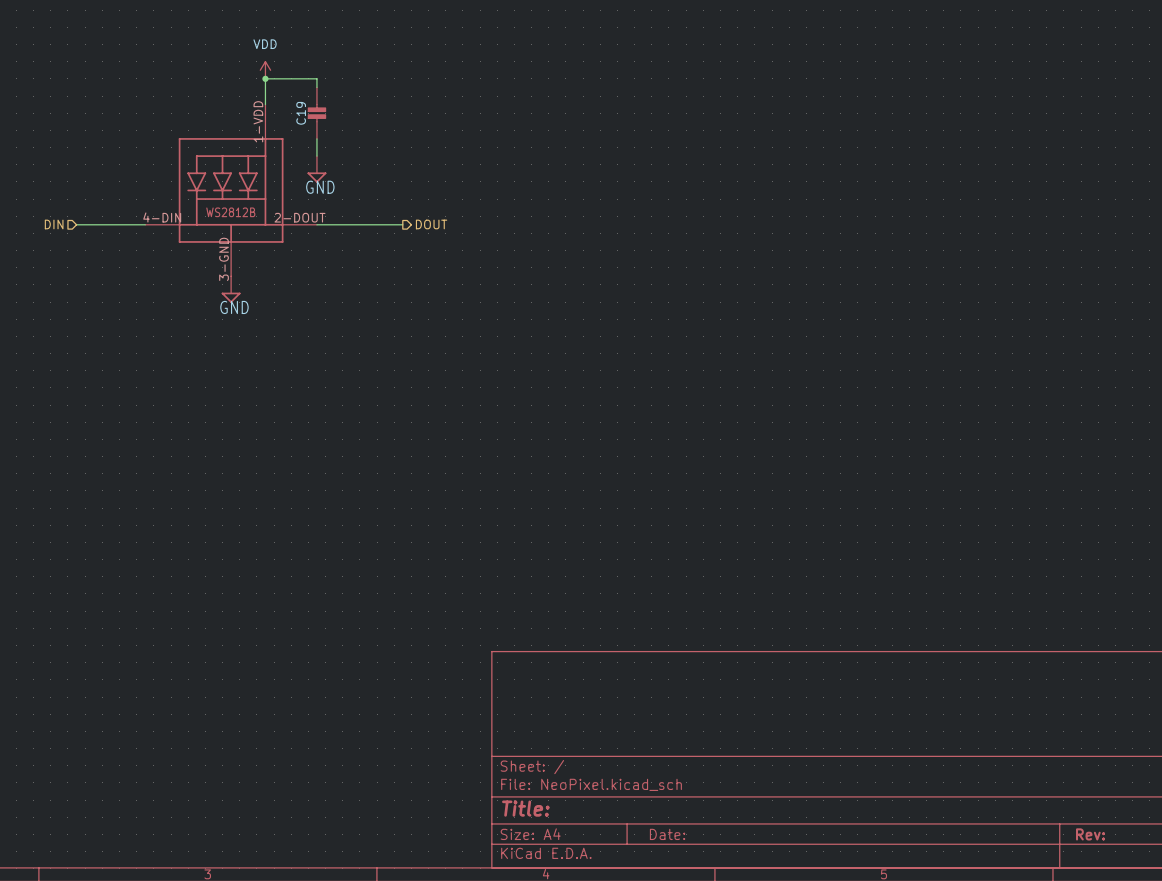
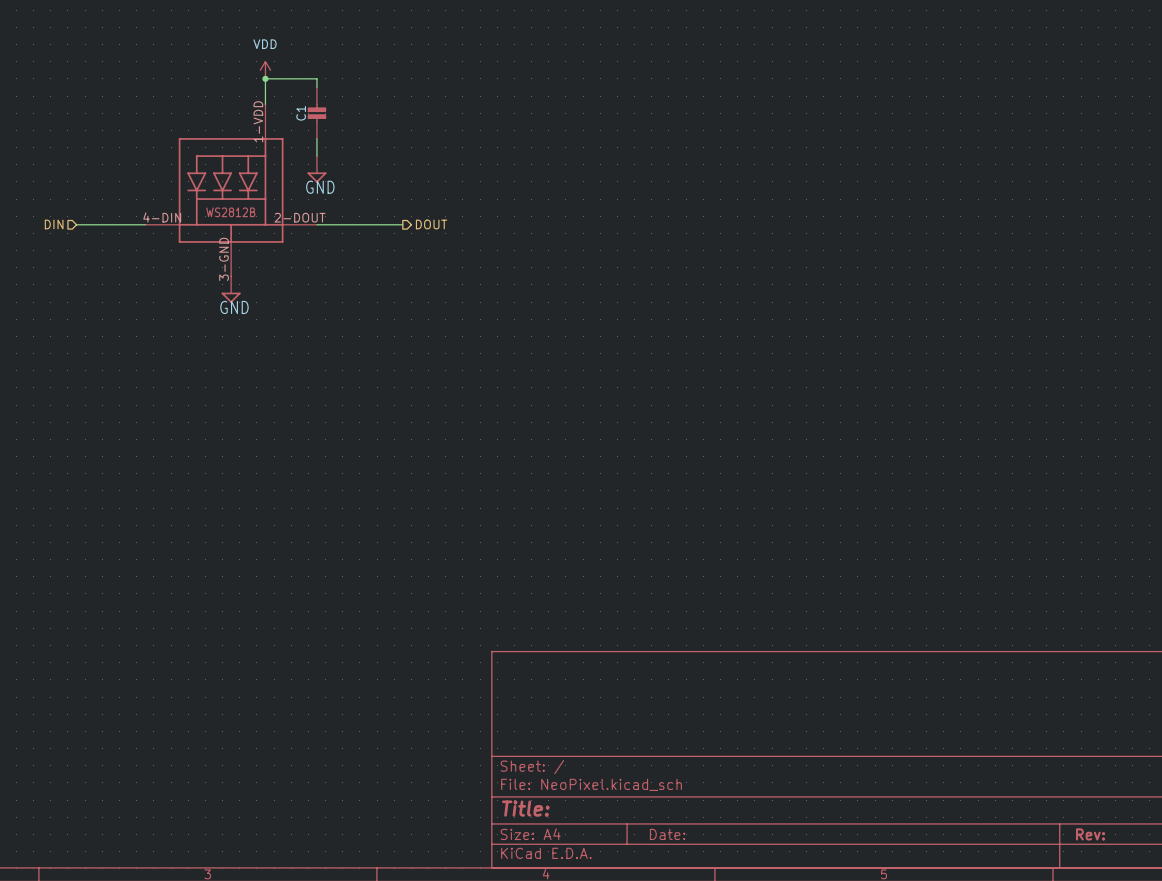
C19 name: C19 (301, 113) -> C1 (301, 113)

